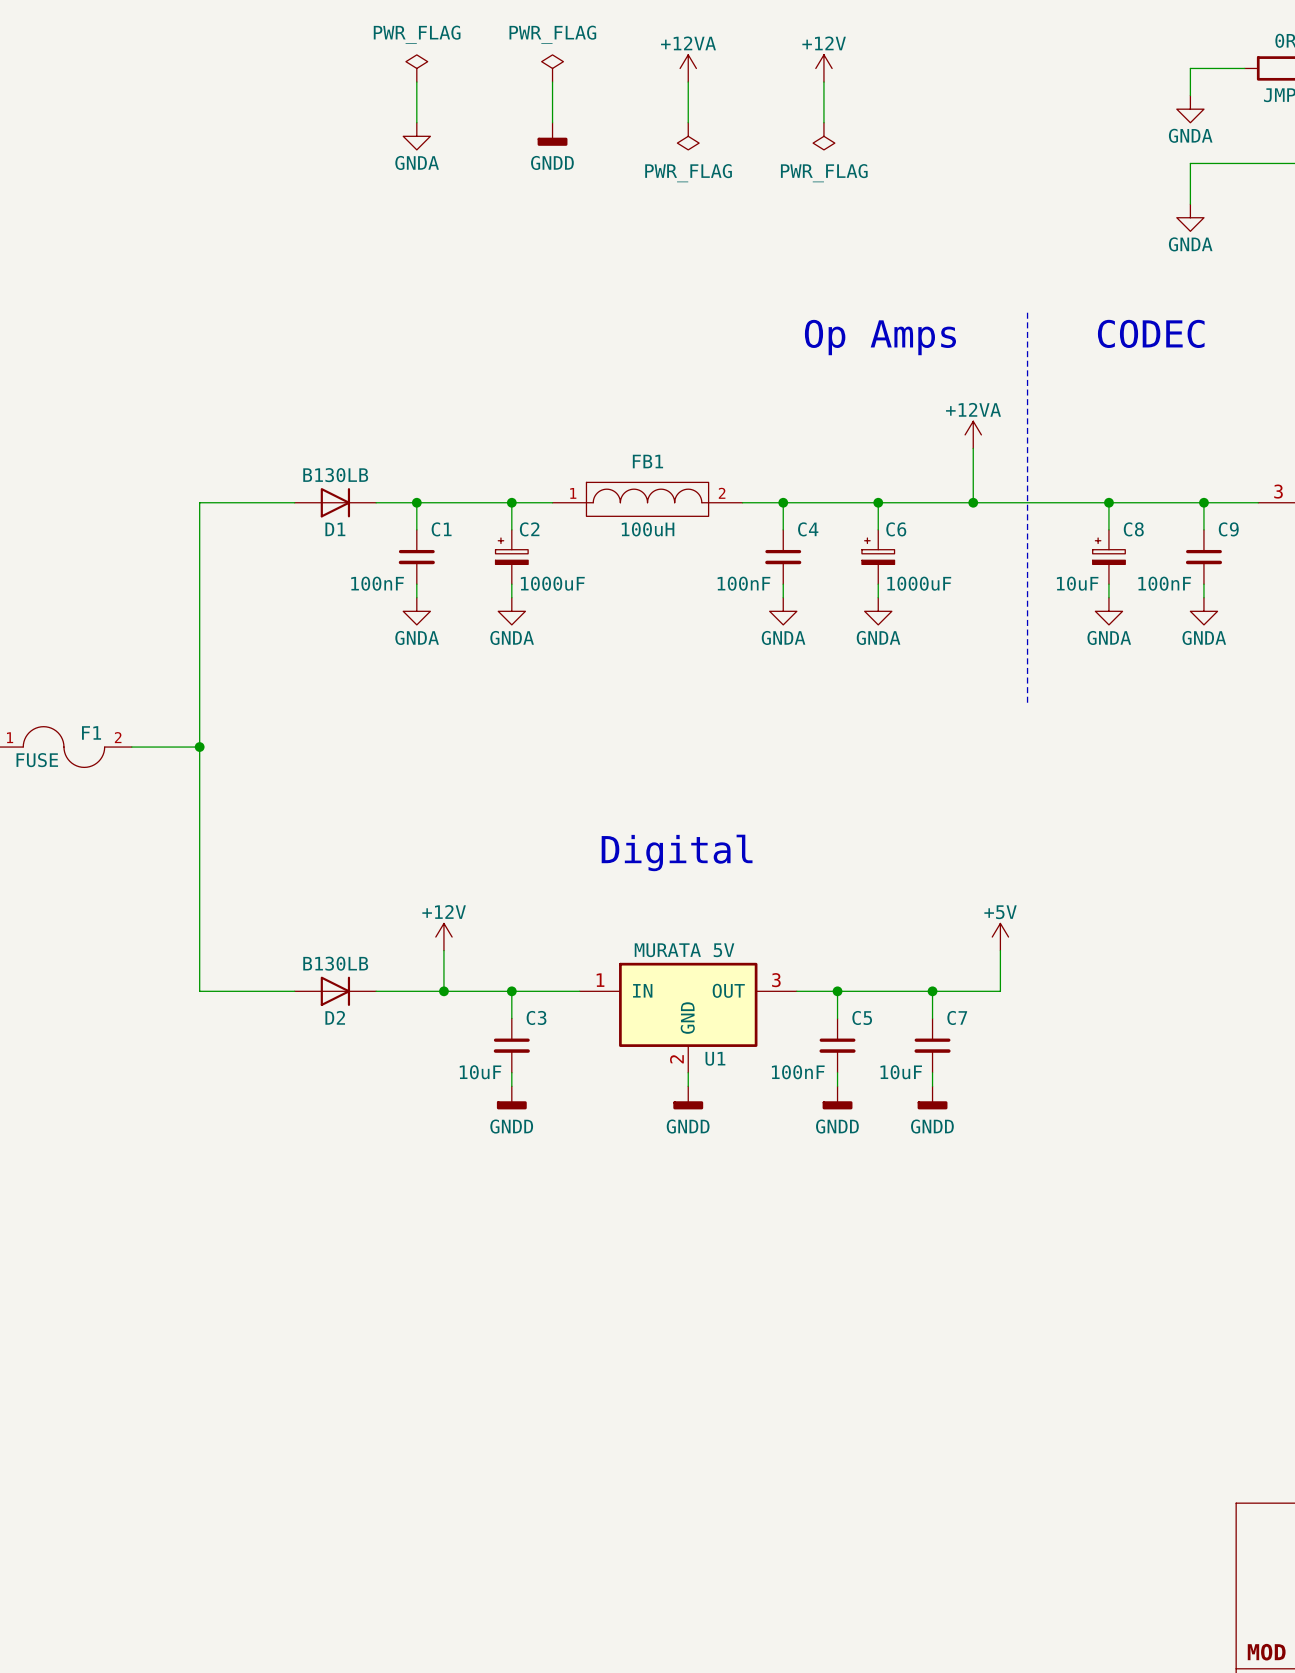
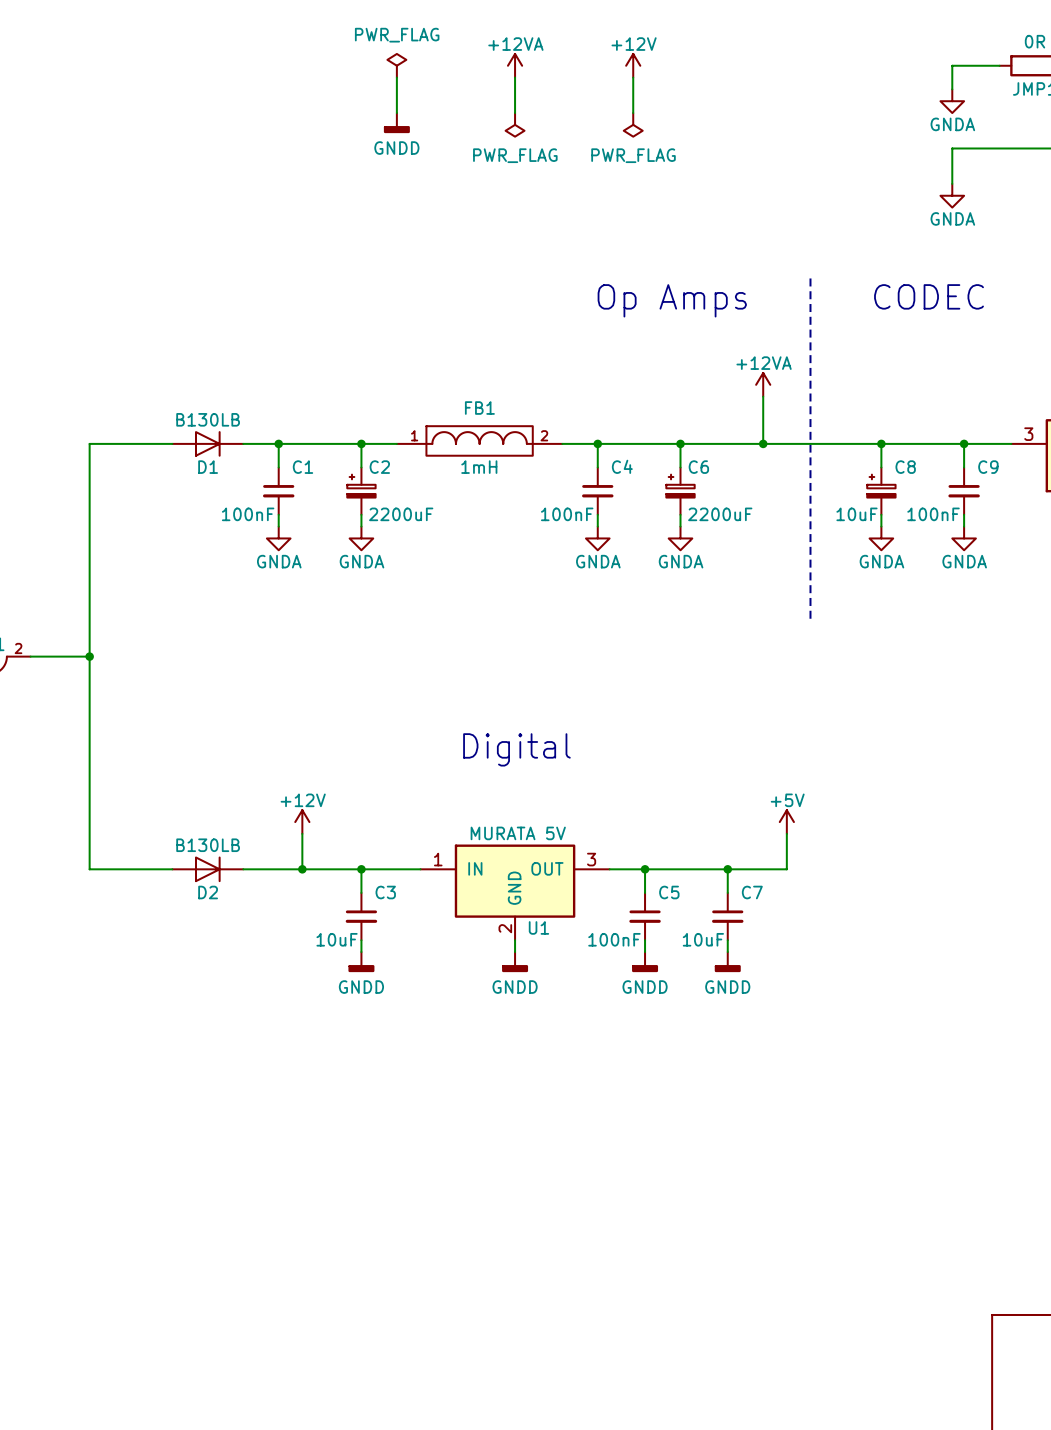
power symbol: PWR_FLAG (416, 68) -> none
wire: (416, 82) (416, 122) -> none
power symbol: GNDA (416, 136) -> none
FB1 value: 100uH (648, 529) -> 1mH (479, 467)
C2 value: 1000uF (552, 583) -> 2200uF (401, 514)
C6 value: 1000uF (919, 583) -> 2200uF (720, 514)

